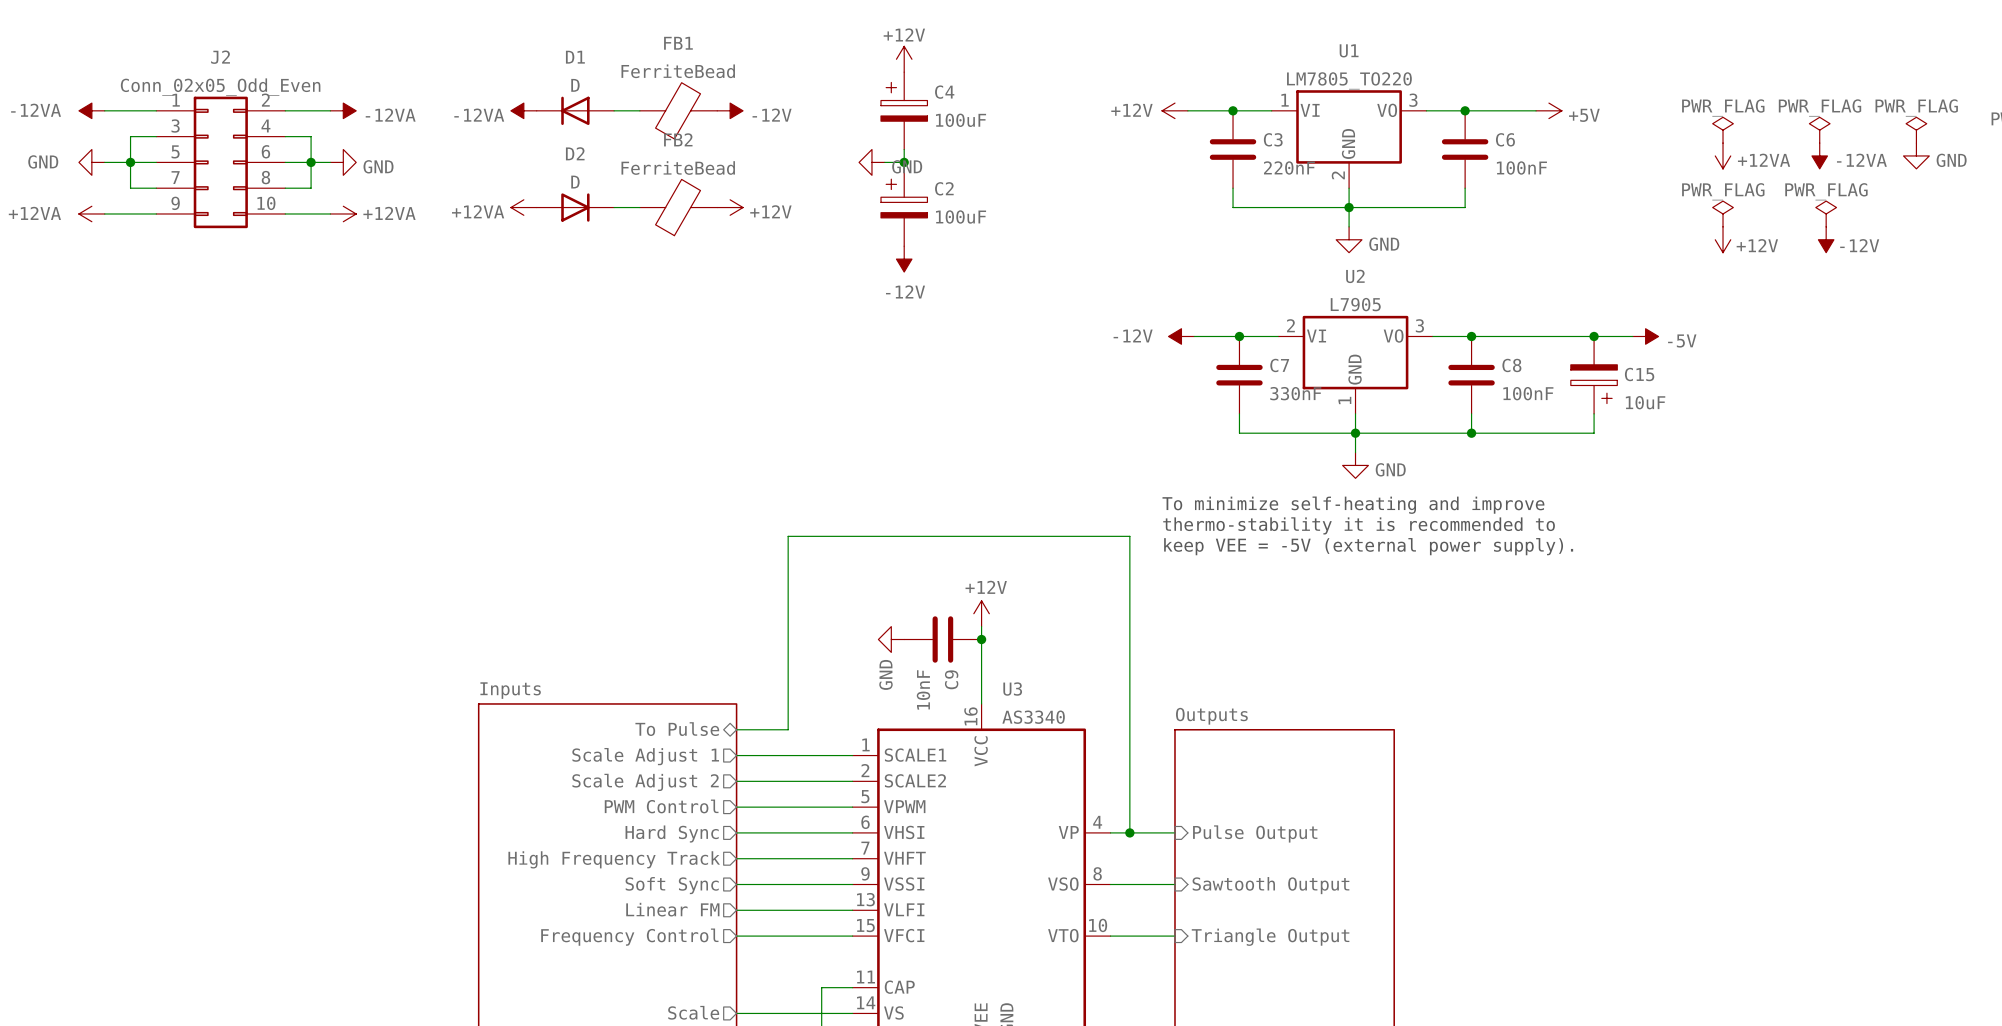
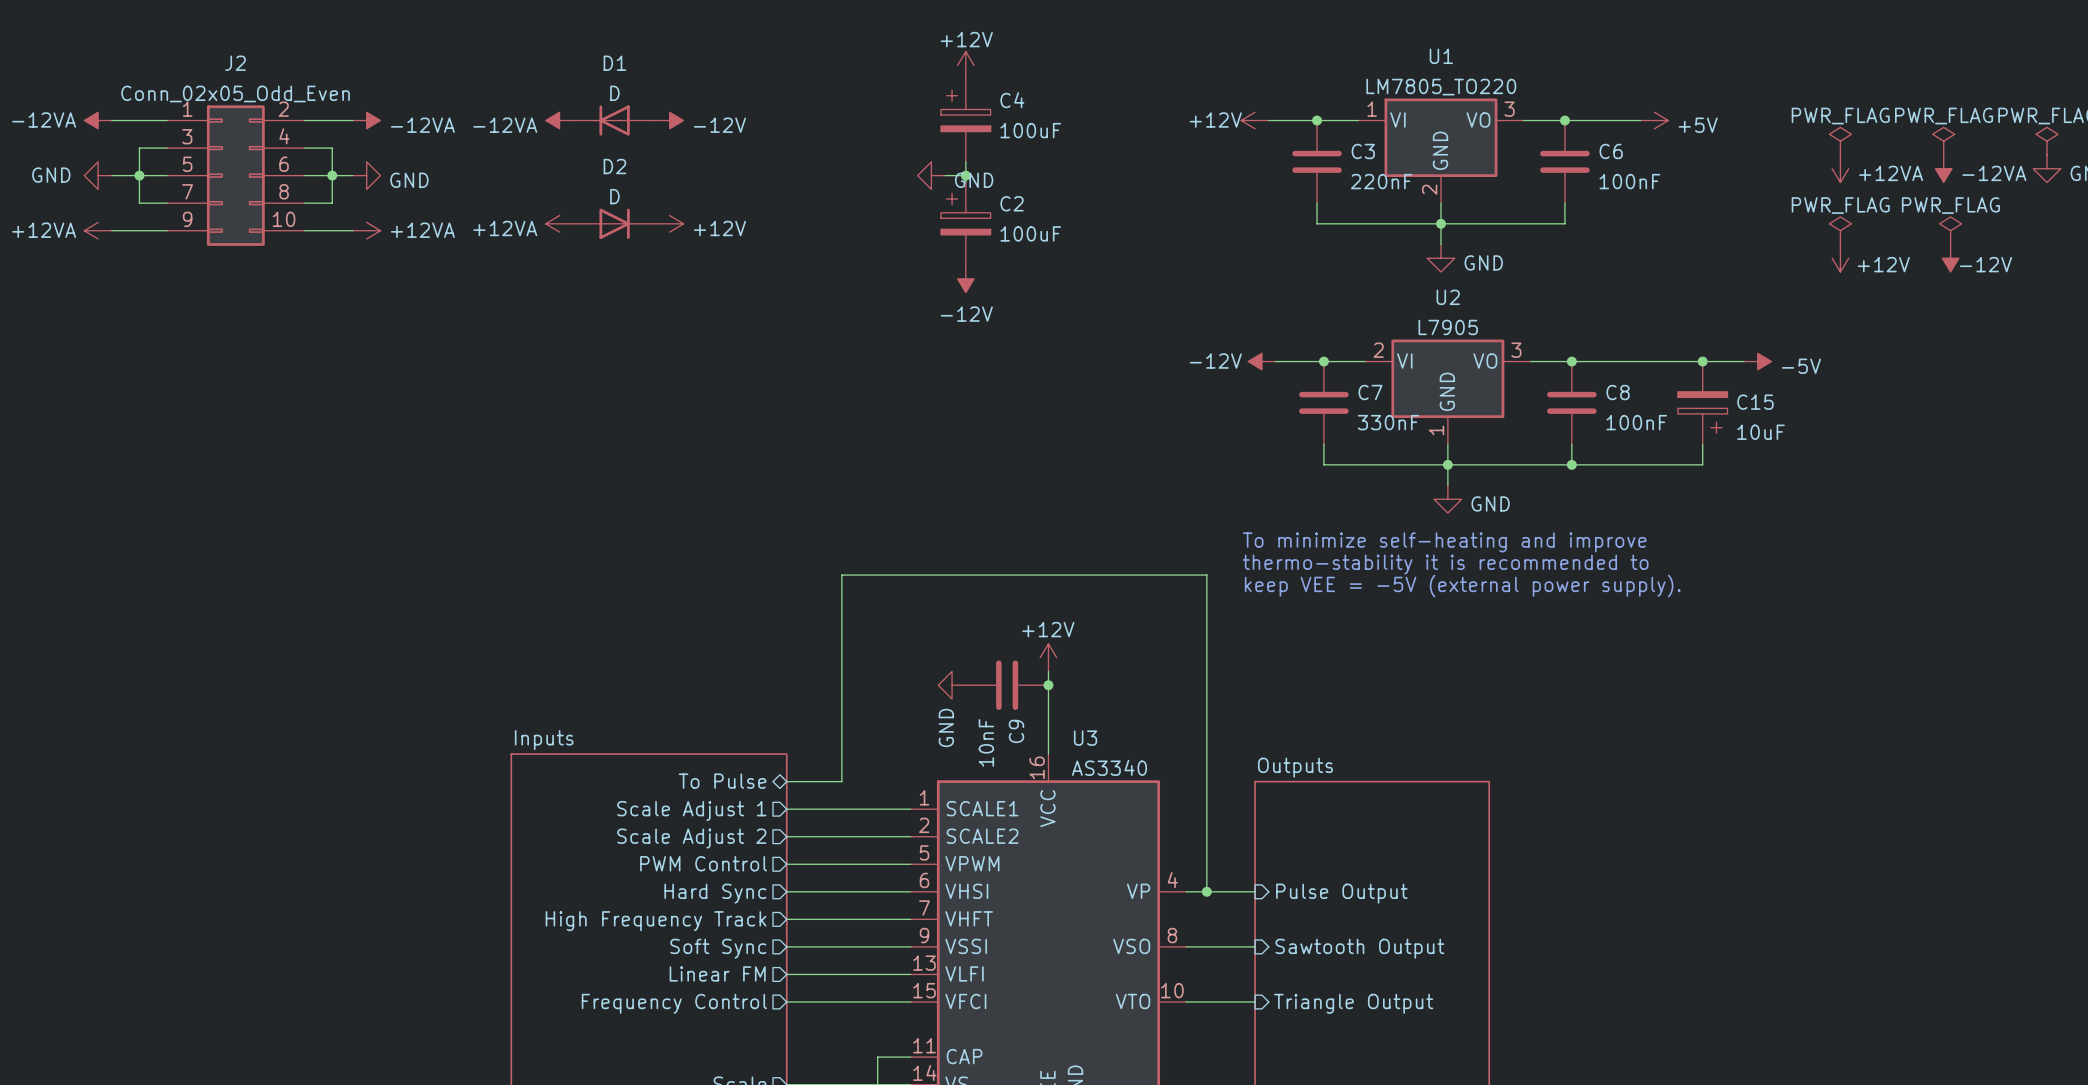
FB1: FerriteBead (678, 110) -> none
power symbol position: -12V (730, 110) -> -12V (669, 120)
FB2: FerriteBead (678, 207) -> none
power symbol position: +12V (730, 207) -> +12V (669, 223)

